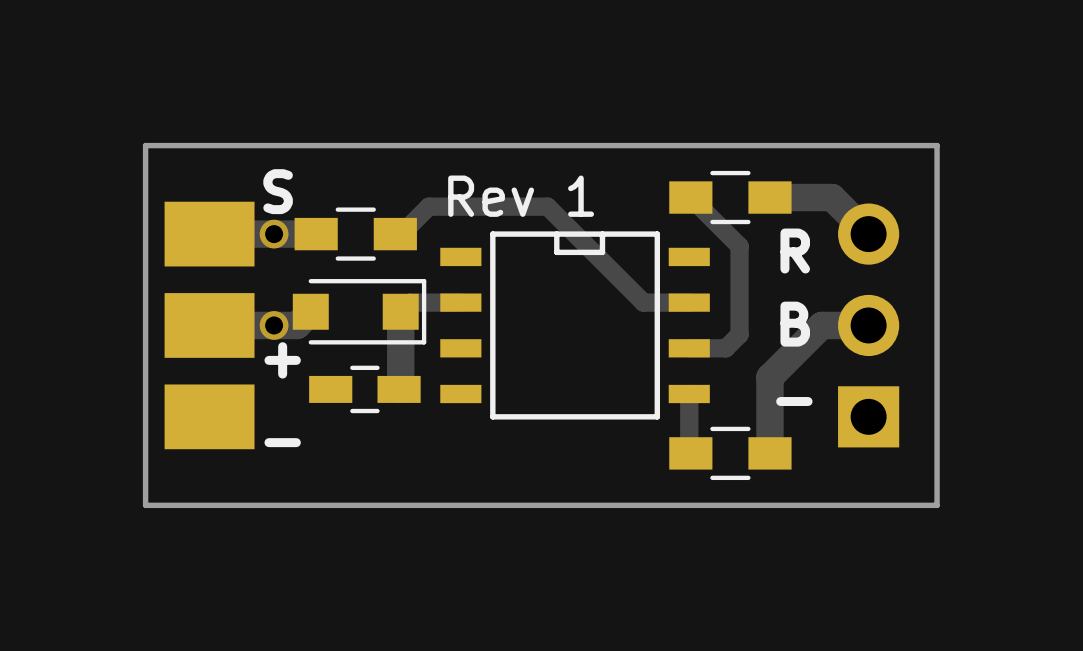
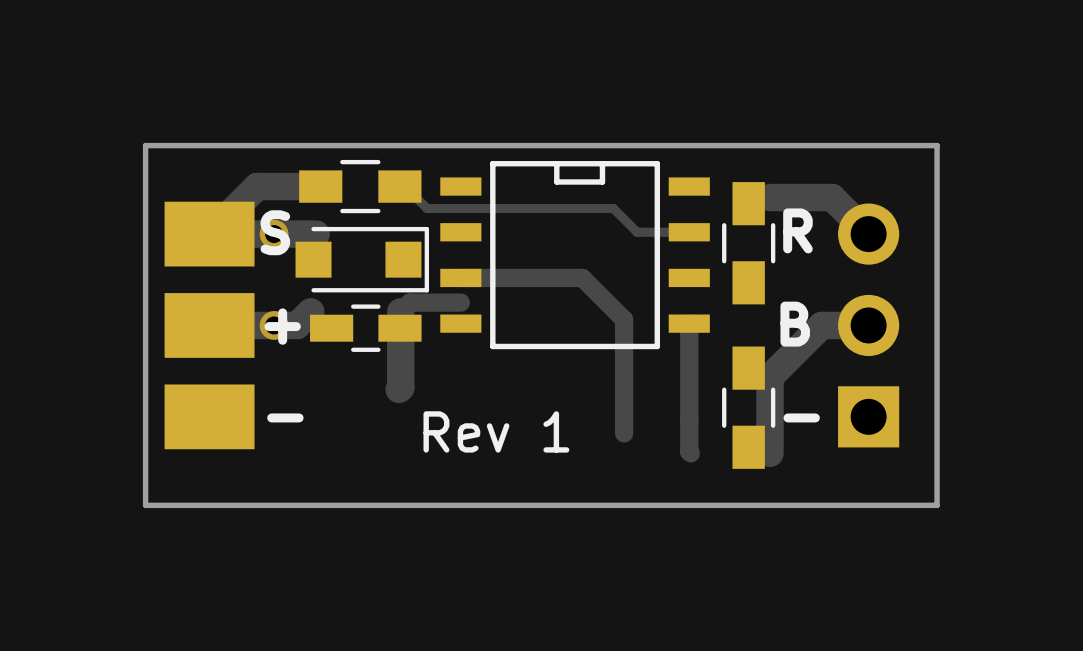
track: none -> (320, 186) (257, 186) (209, 234)
track: none -> (399, 186) (405, 186) (427, 208) (613, 208) (637, 232) (689, 232)
text position: S (278, 191) -> S (275, 232)
text position: Rev 1 (521, 196) -> Rev 1 (496, 431)
track: (690, 197) (739, 246) (739, 334) (725, 348) (689, 348) -> none
part rotation: 0° (730, 197) -> 90° clockwise (748, 243)
part position: (355, 234) -> (360, 186)
track: (395, 234) (401, 234) (428, 206) (547, 206) (643, 302) (689, 302) -> none
text position: R (795, 251) -> R (797, 230)
part: none -> (362, 259)
track: none -> (460, 277) (582, 277) (624, 319) (624, 433)
part footprint: [292, 279, 427, 345] -> [310, 304, 422, 352]
track: none -> (689, 323) (689, 394)
part position: (575, 325) -> (575, 255)
text position: + (282, 360) -> + (282, 326)
part: (364, 389) -> none
text position: - (794, 401) -> - (801, 417)
text position: - (282, 442) -> - (285, 417)
part rotation: 0° (730, 453) -> 90° clockwise (748, 407)

